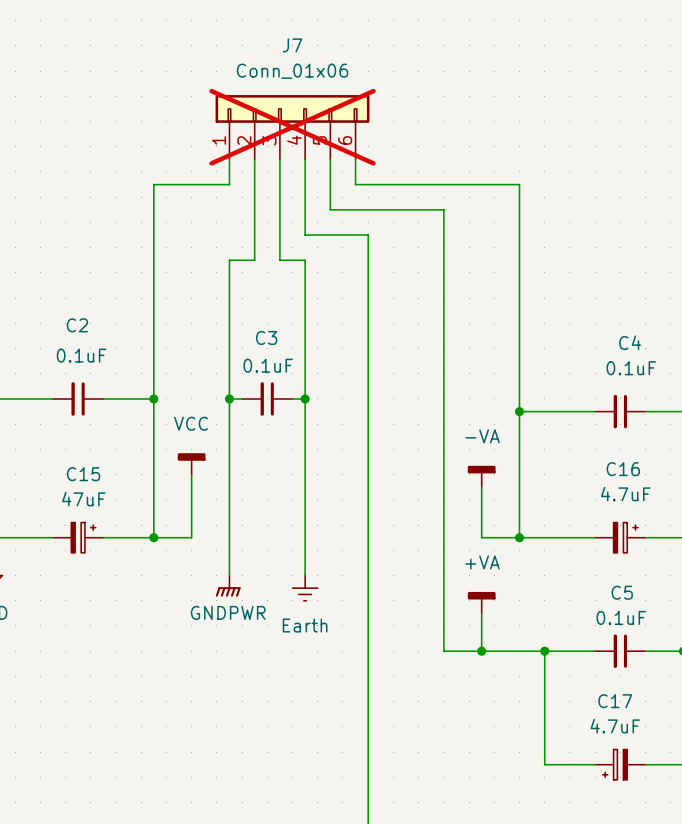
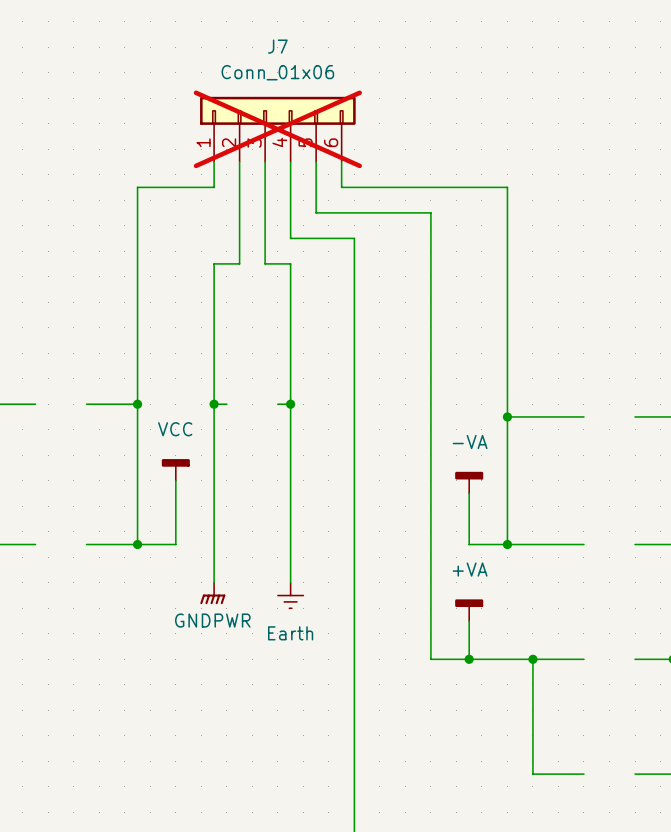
C2: 0.1uF (78, 398) -> none
C3: 0.1uF (267, 398) -> none
C4: 0.1uF (620, 411) -> none
C15: 47uF (78, 537) -> none
C16: 4.7uF (620, 537) -> none
C5: 0.1uF (620, 651) -> none
C17: 4.7uF (620, 764) -> none

